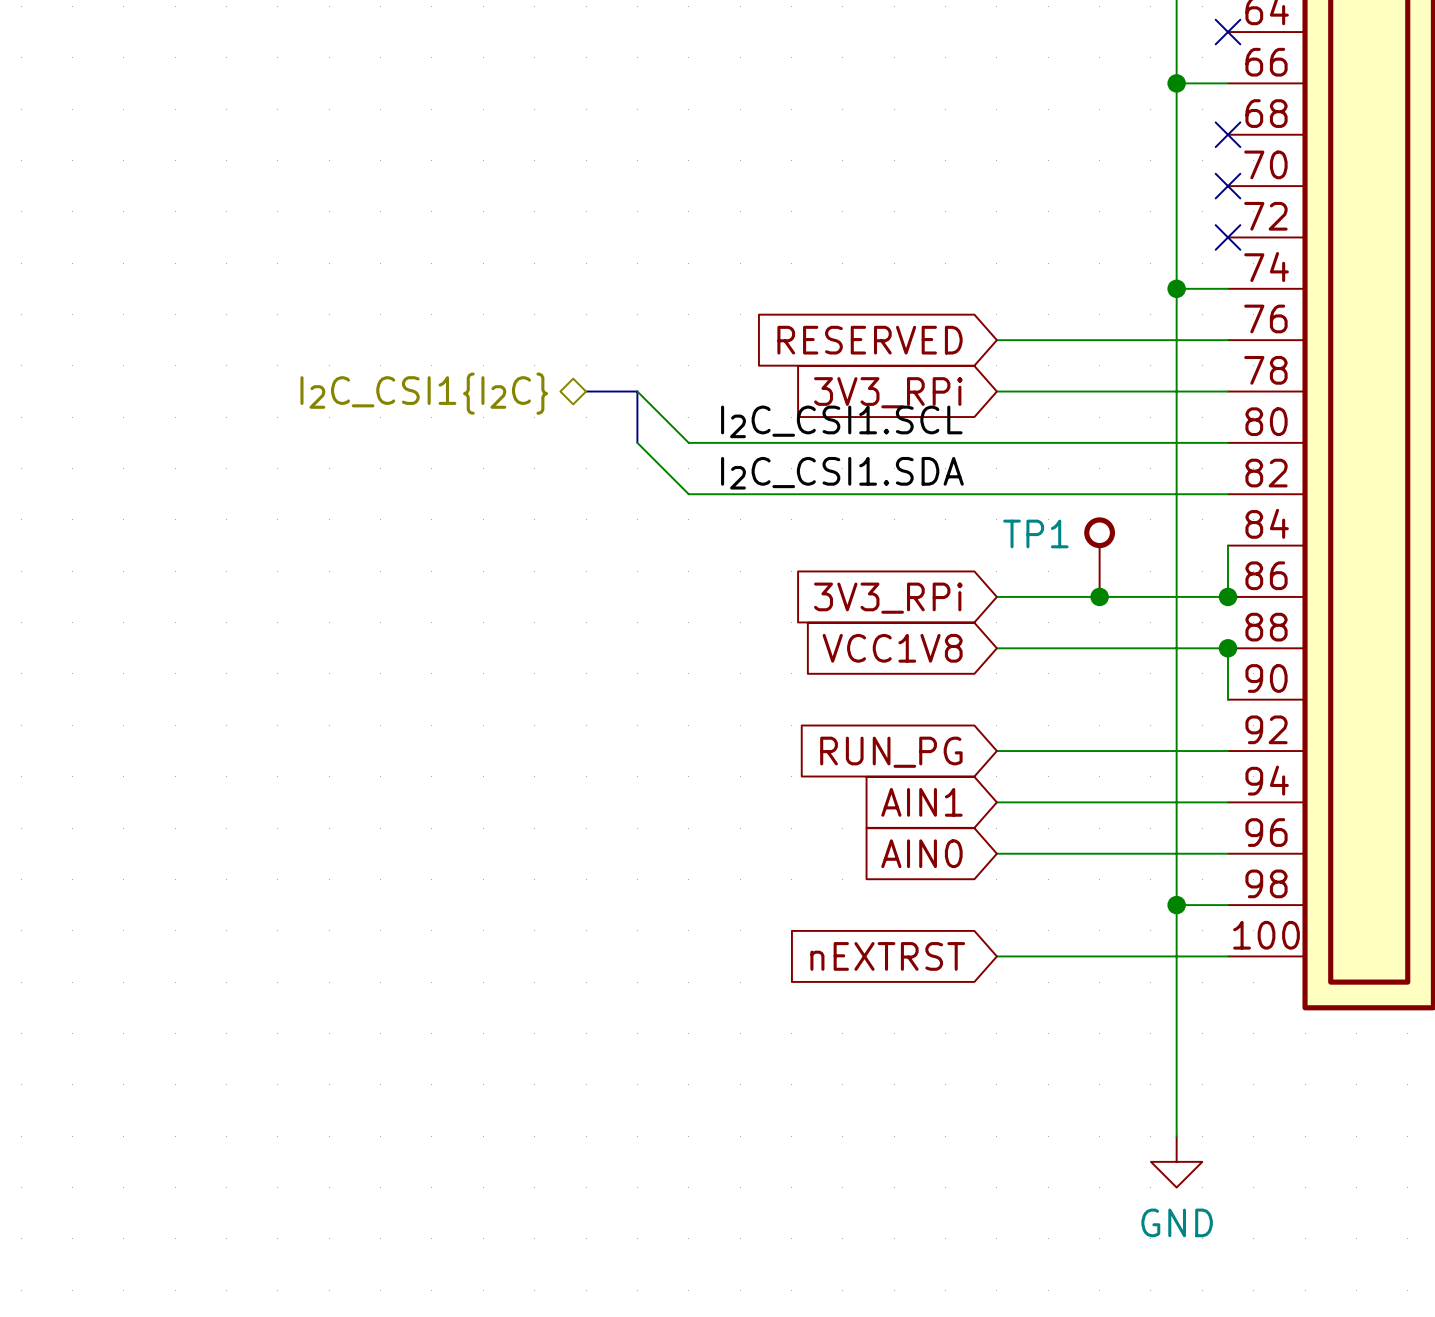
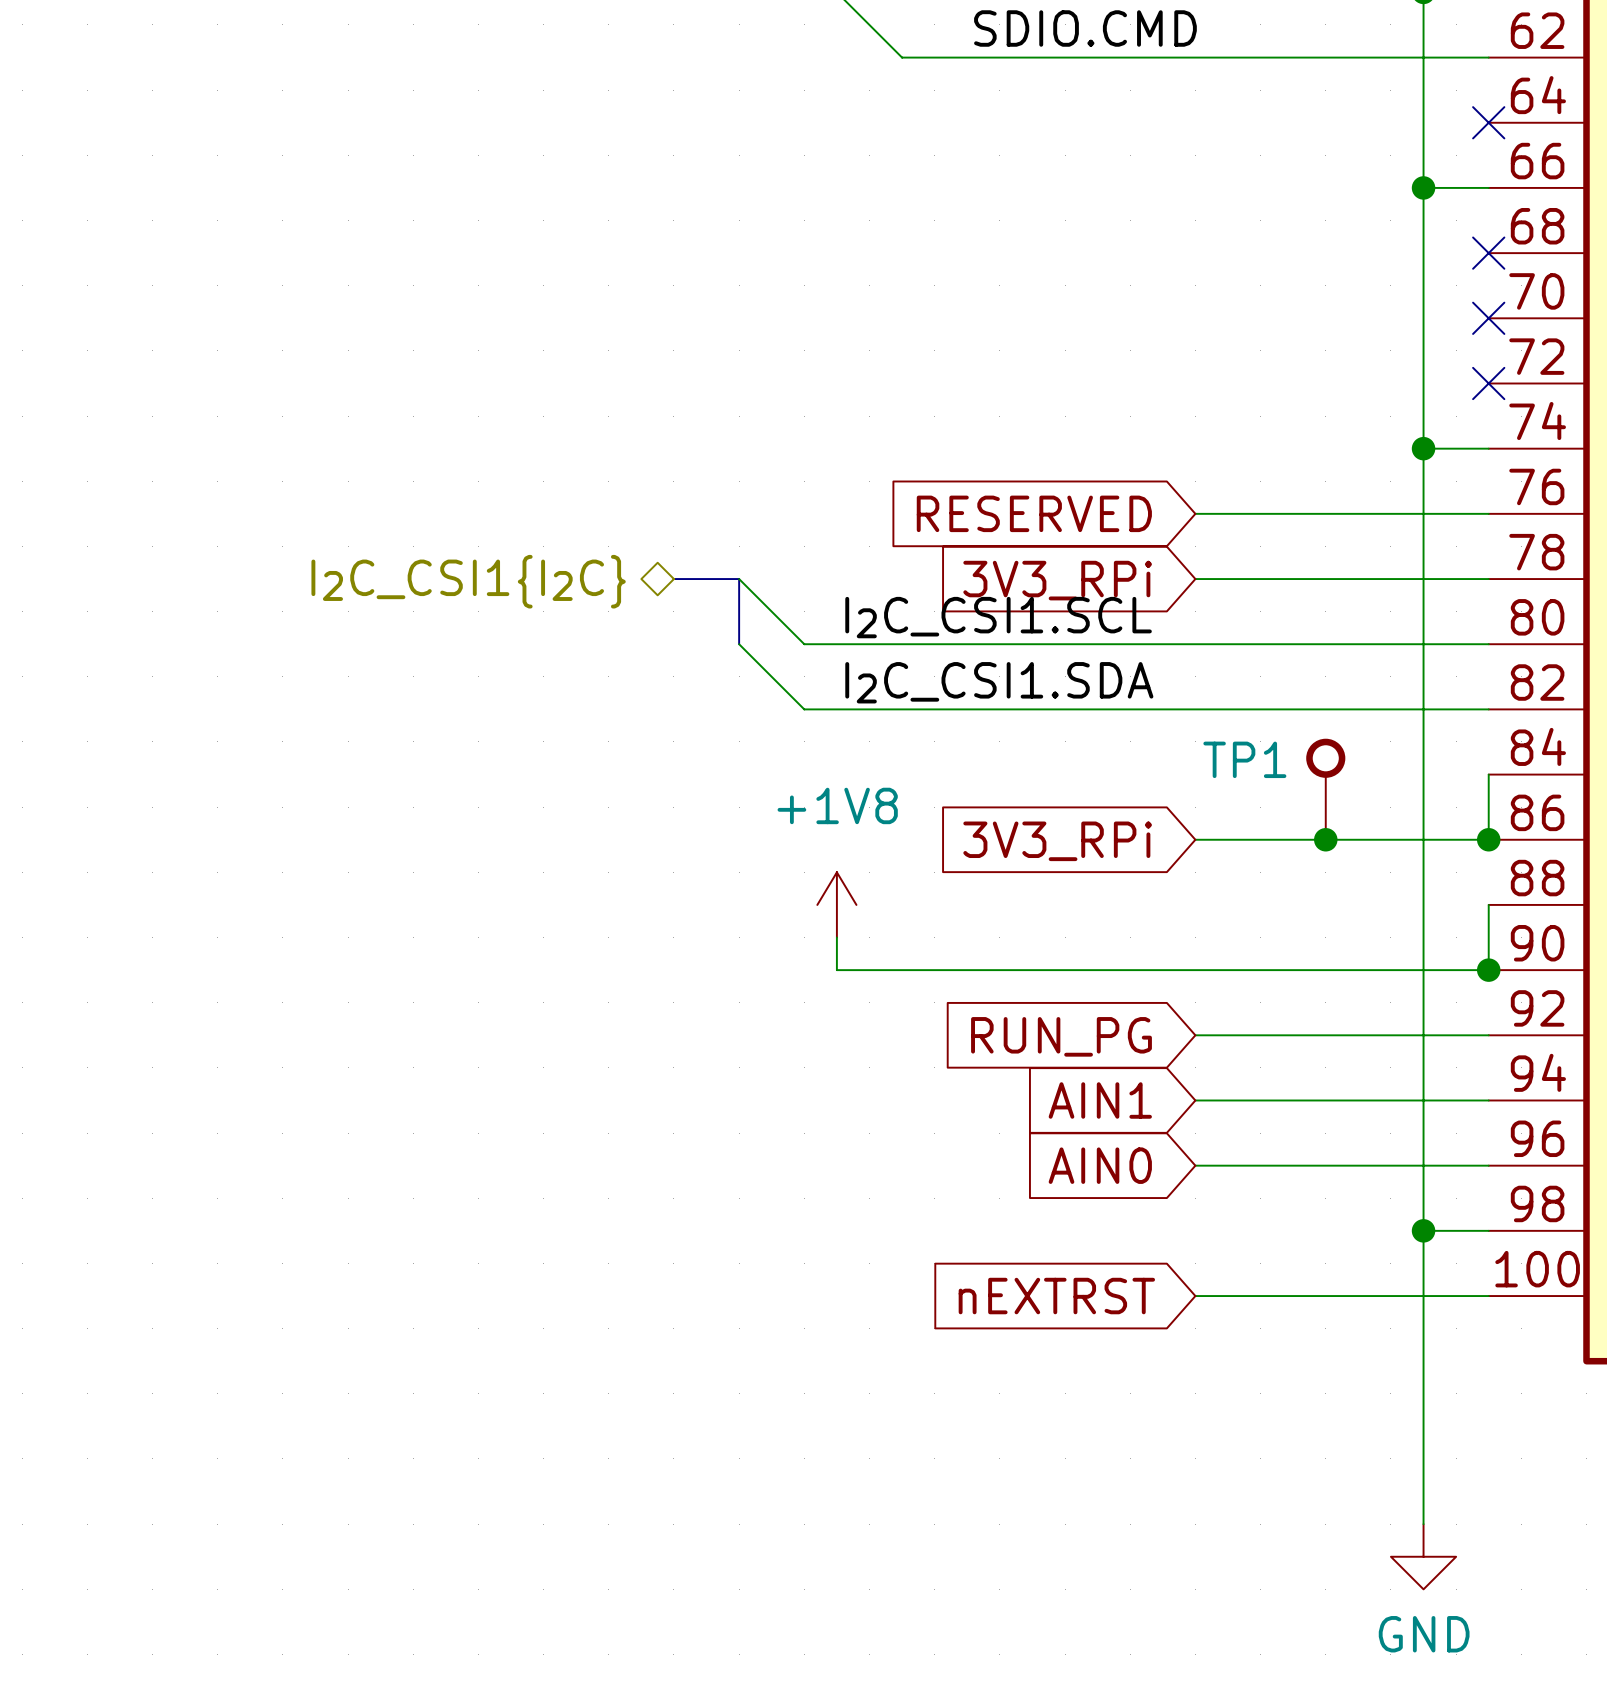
power symbol: none -> +1V8 (836, 904)
global label: VCC1V8 (892, 648) -> none
wire: (996, 648) (1228, 648) -> none
junction position: (1228, 648) -> (1488, 970)
wire: none -> (836, 937) (836, 970) (1488, 970)

